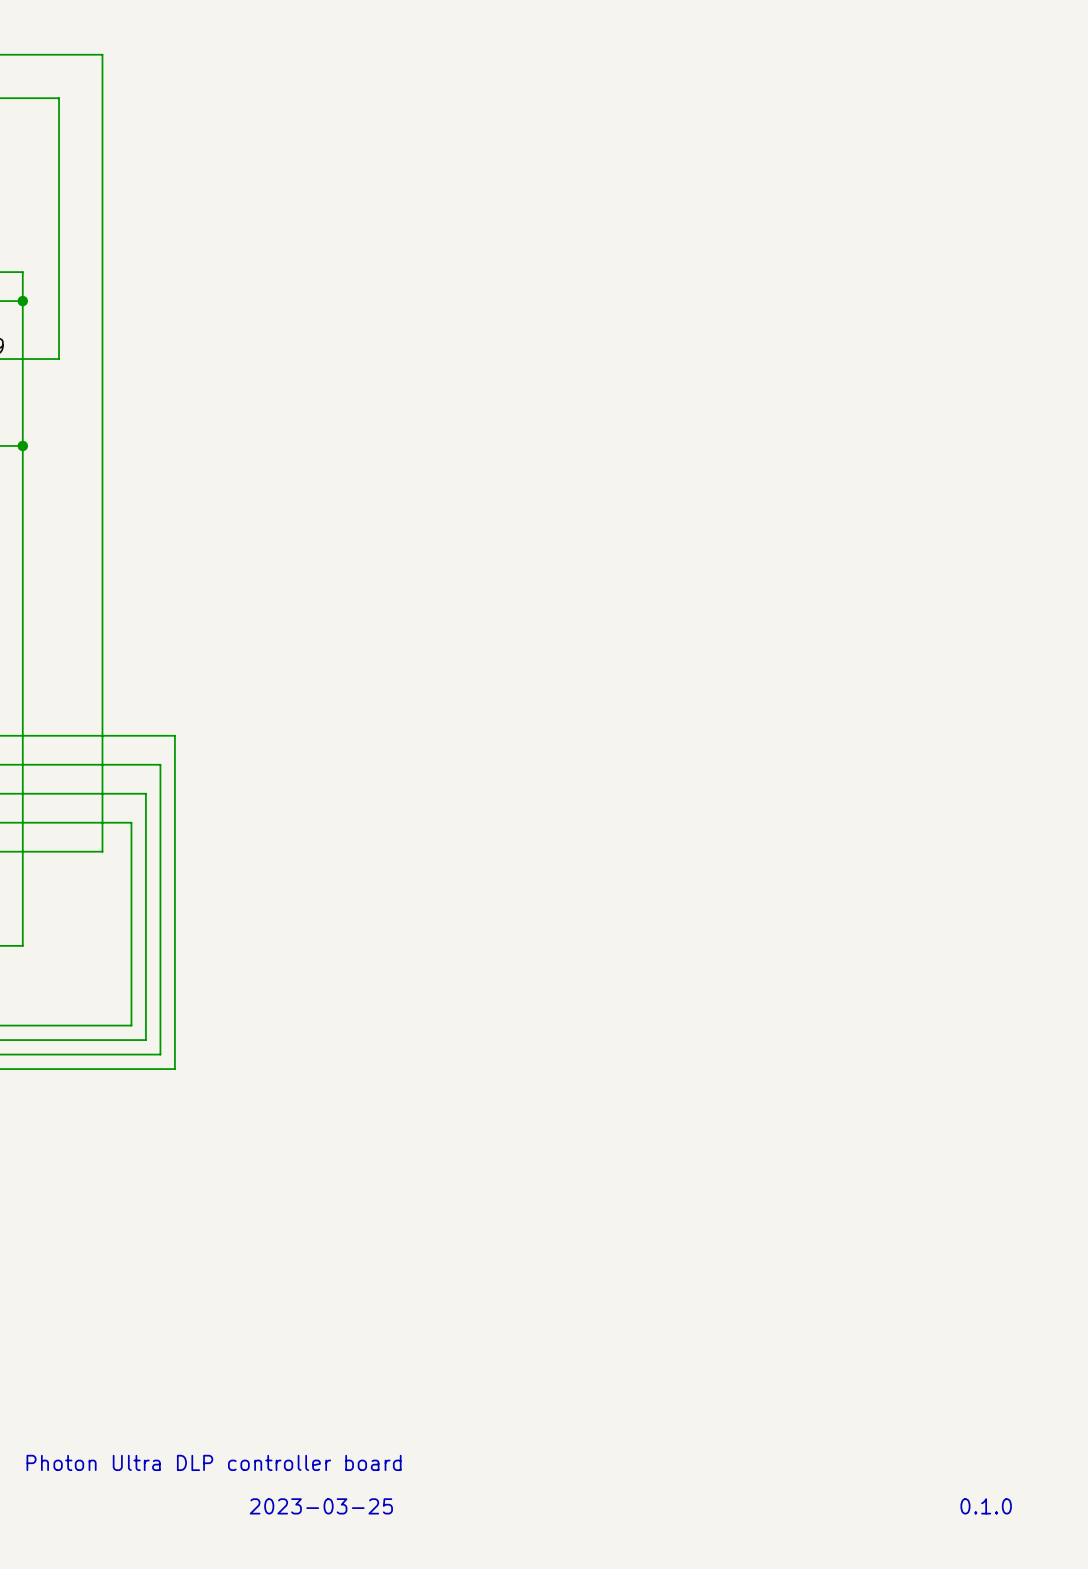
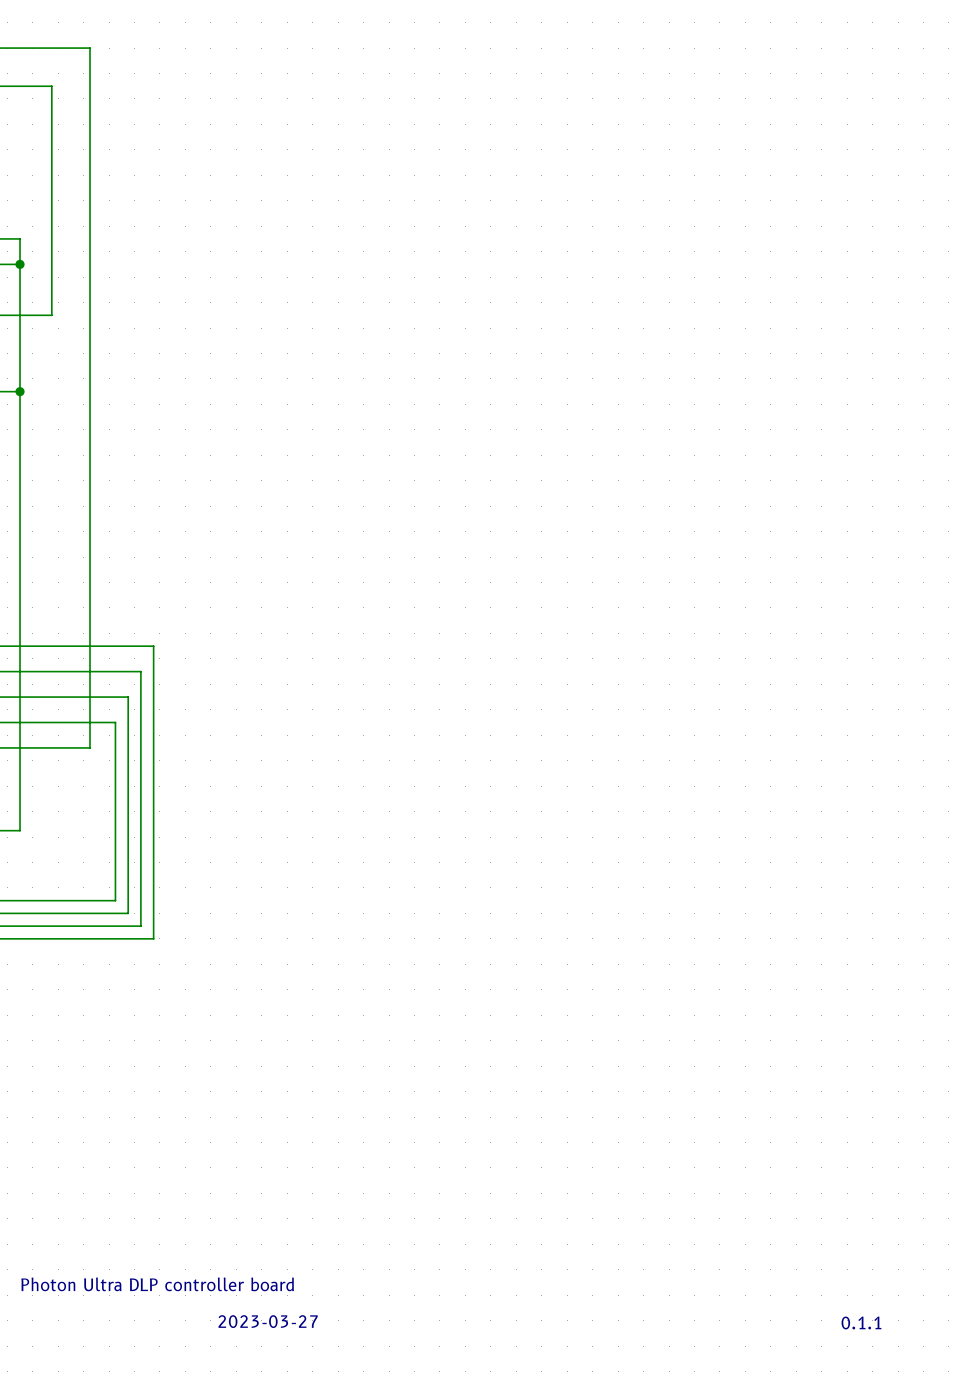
text: 2023-03-25 (321, 1506) -> 2023-03-27 (268, 1321)
text: 0.1.0 (986, 1506) -> 0.1.1 (861, 1322)

